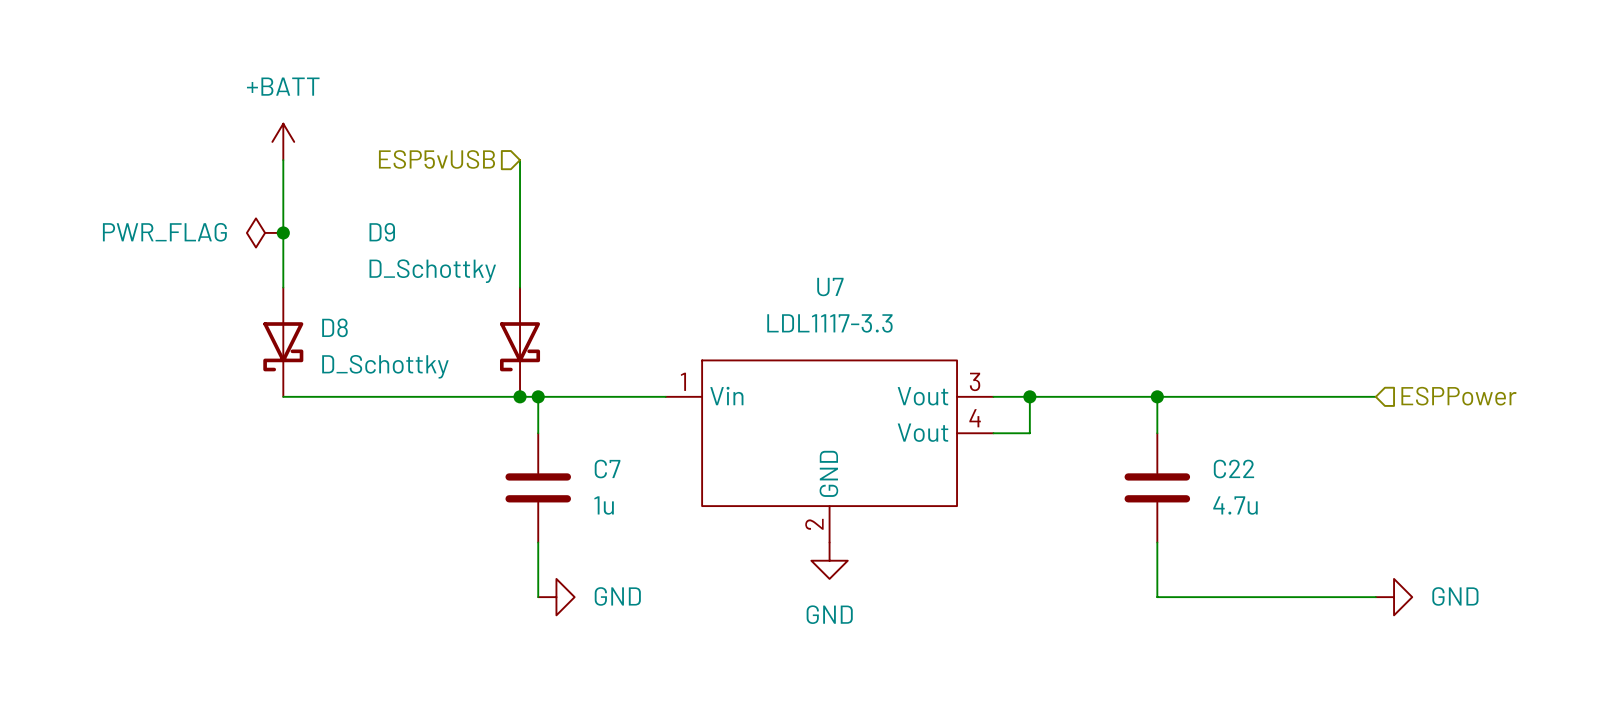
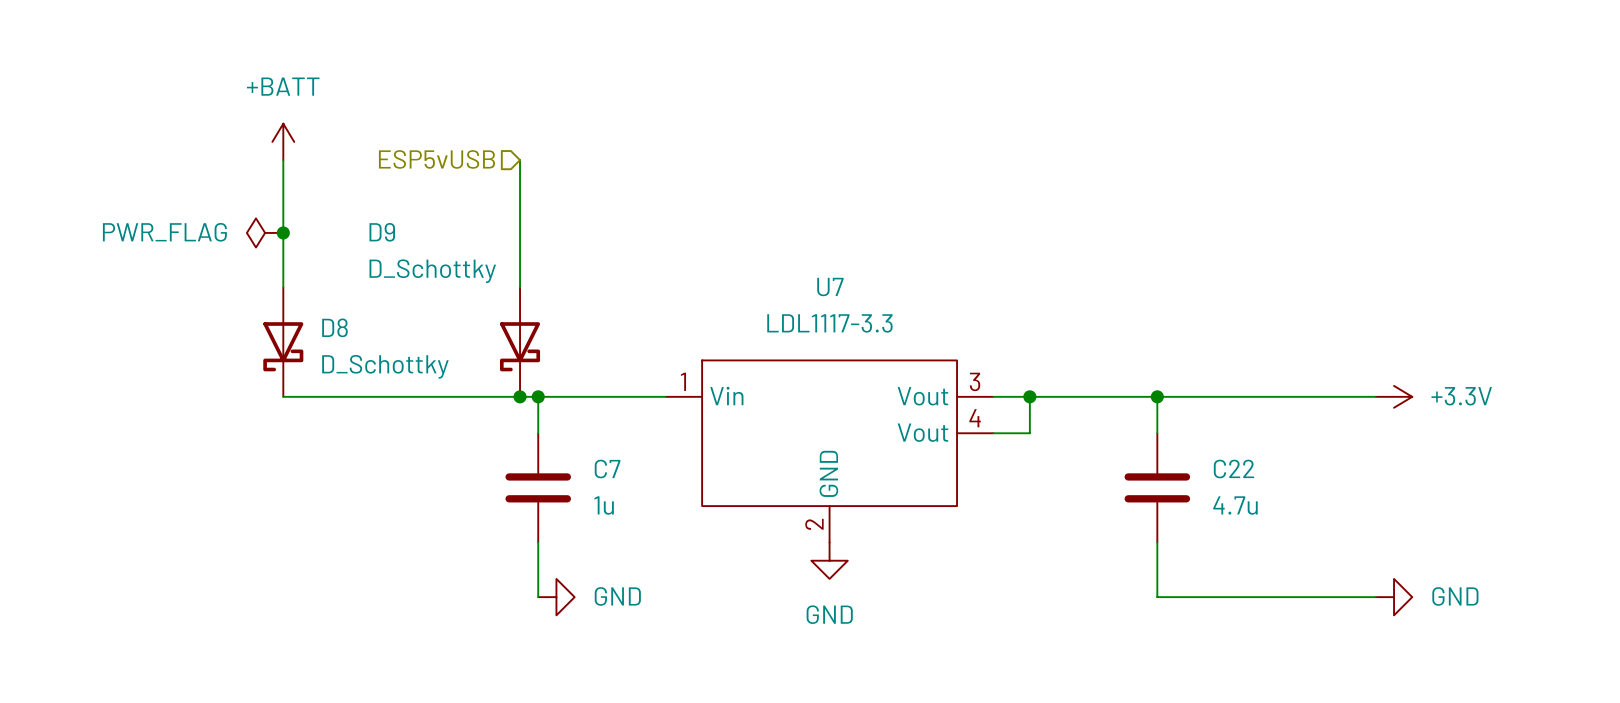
power symbol: none -> +3.3V (1394, 396)
hierarchical label: ESPPower (1458, 396) -> none

